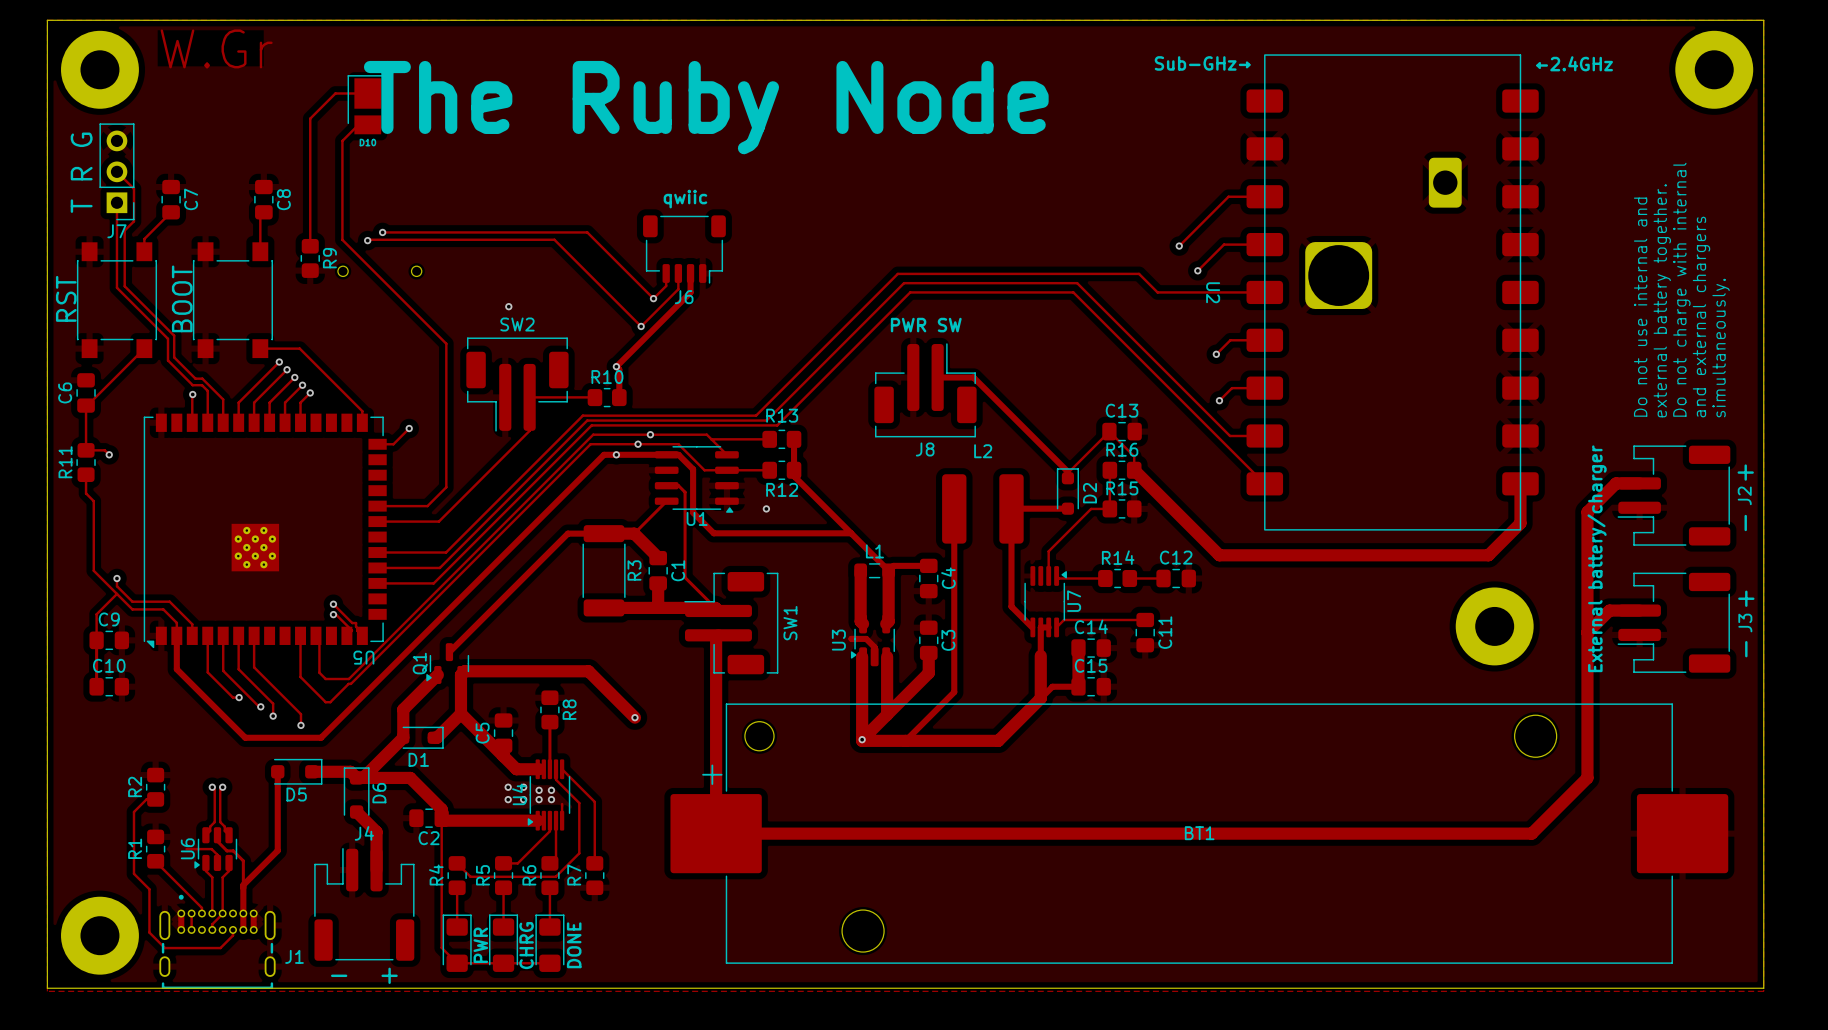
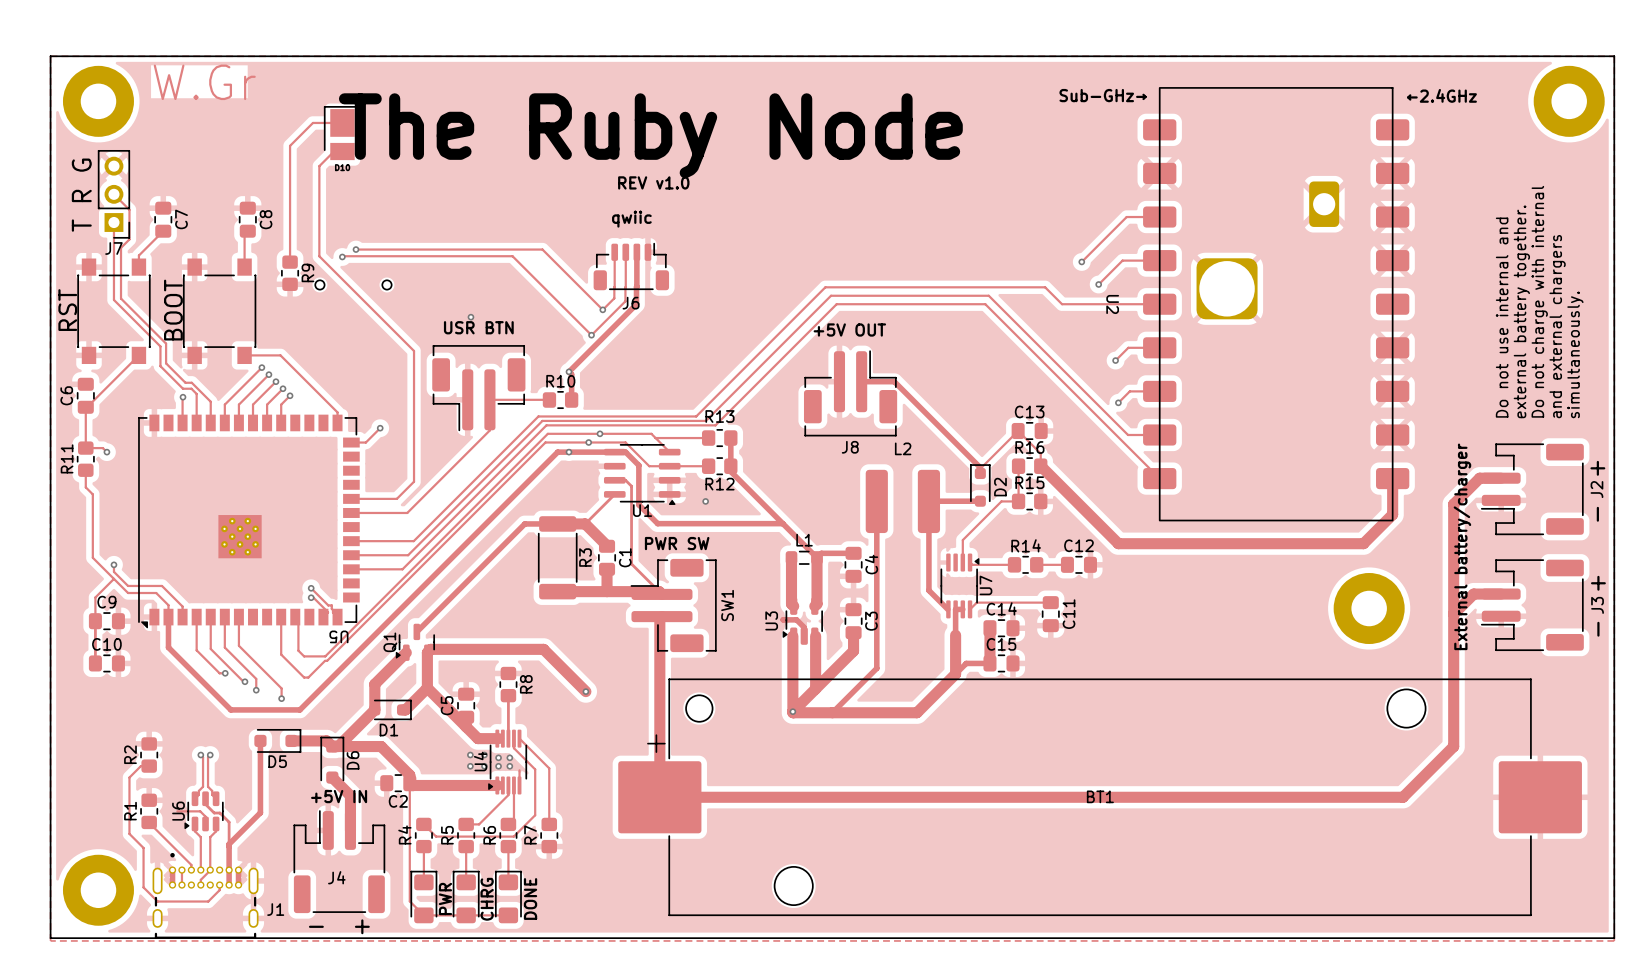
text: none -> REV v1.0 (653, 182)
J6 footprint: [643, 215, 726, 284] -> [593, 242, 670, 291]
track: none -> (614, 252) (614, 289)
track: none -> (625, 252) (625, 289)
track: none -> (636, 252) (636, 286)
text: none -> USR BTN (478, 327)
SW2 name: SW2 (517, 324) -> none
text: PWR SW (926, 325) -> +5V OUT (849, 329)
text: none -> PWR SW (677, 543)
text: none -> +5V IN (339, 796)
J4 name position: J4 (364, 833) -> J4 (336, 877)

